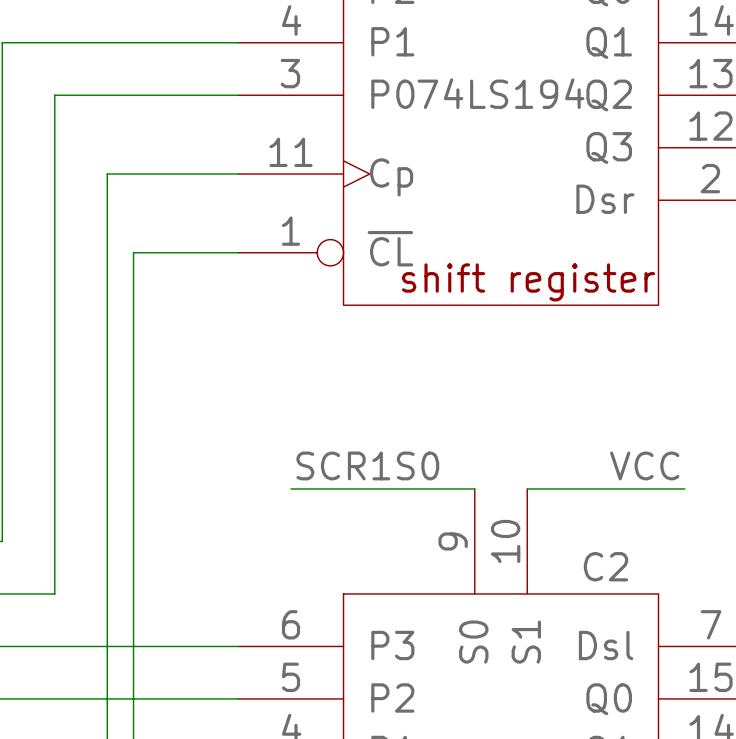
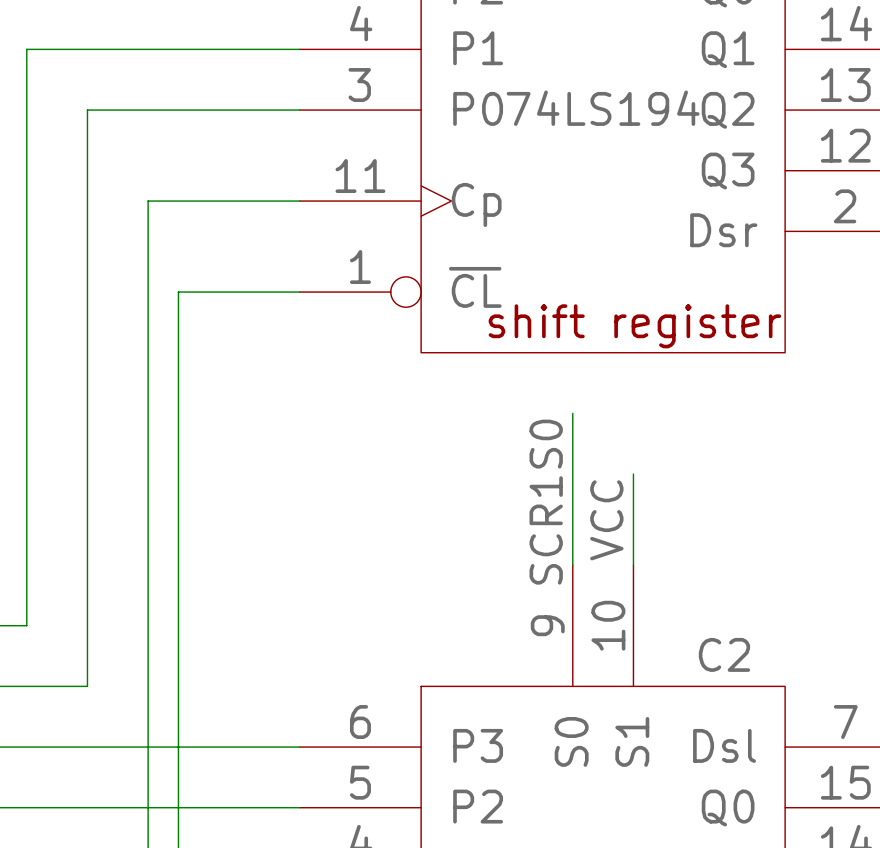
label rotation: 0° (367, 465) -> 90° counterclockwise (546, 502)
label rotation: 0° (644, 465) -> 90° counterclockwise (606, 520)
label position: VCC (644, 465) -> VCC (606, 520)
wire: (291, 488) (474, 488) -> (572, 413) (572, 565)
wire: (527, 488) (684, 488) -> (633, 565) (633, 474)

